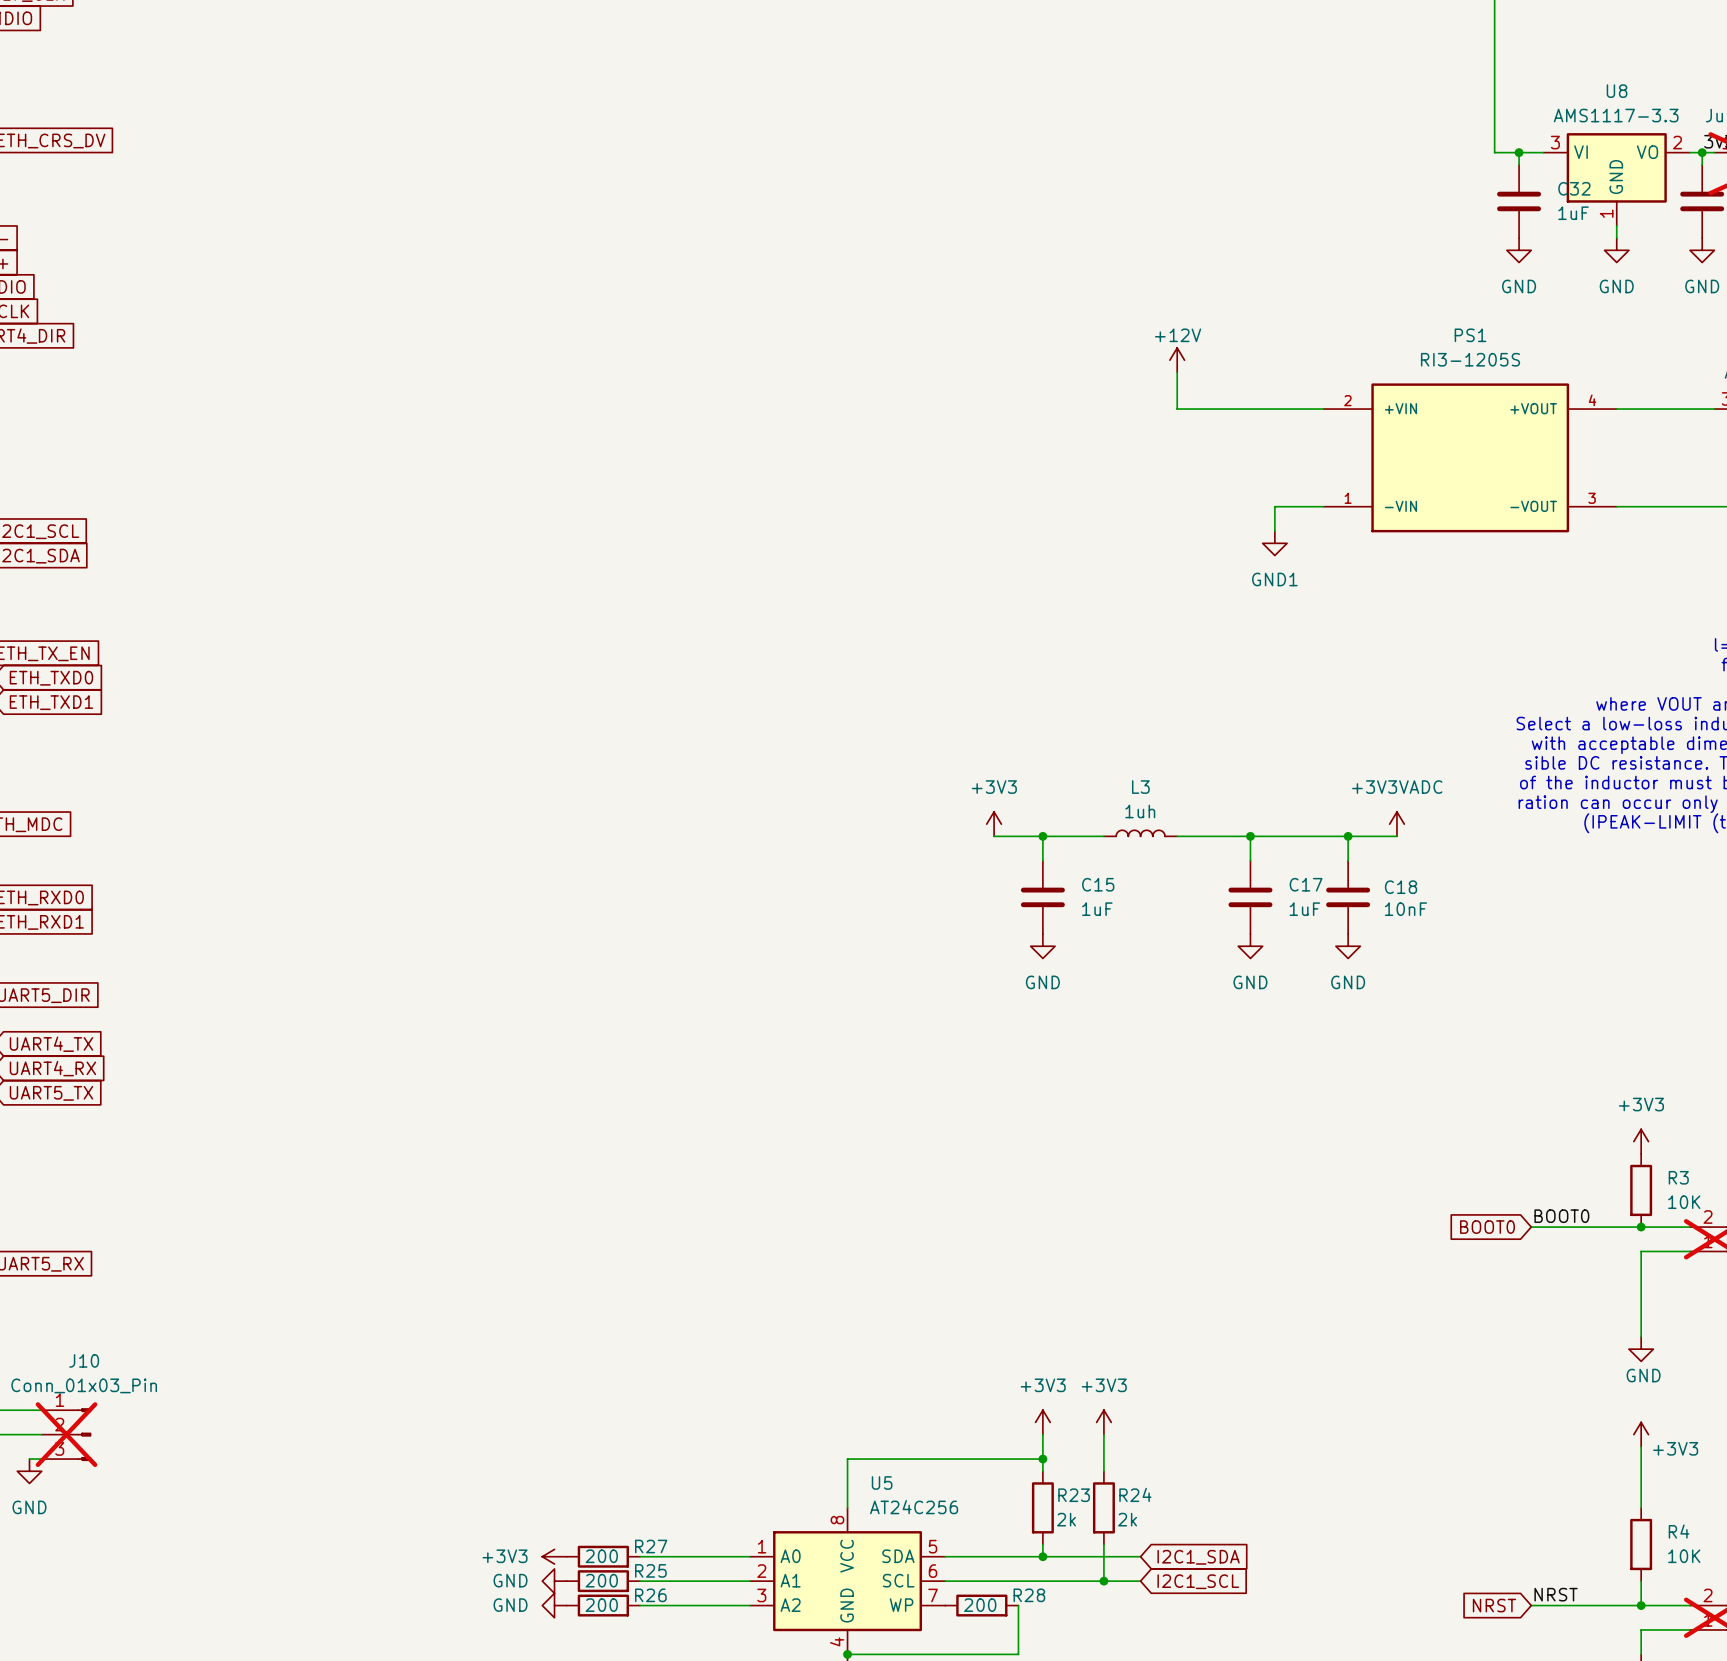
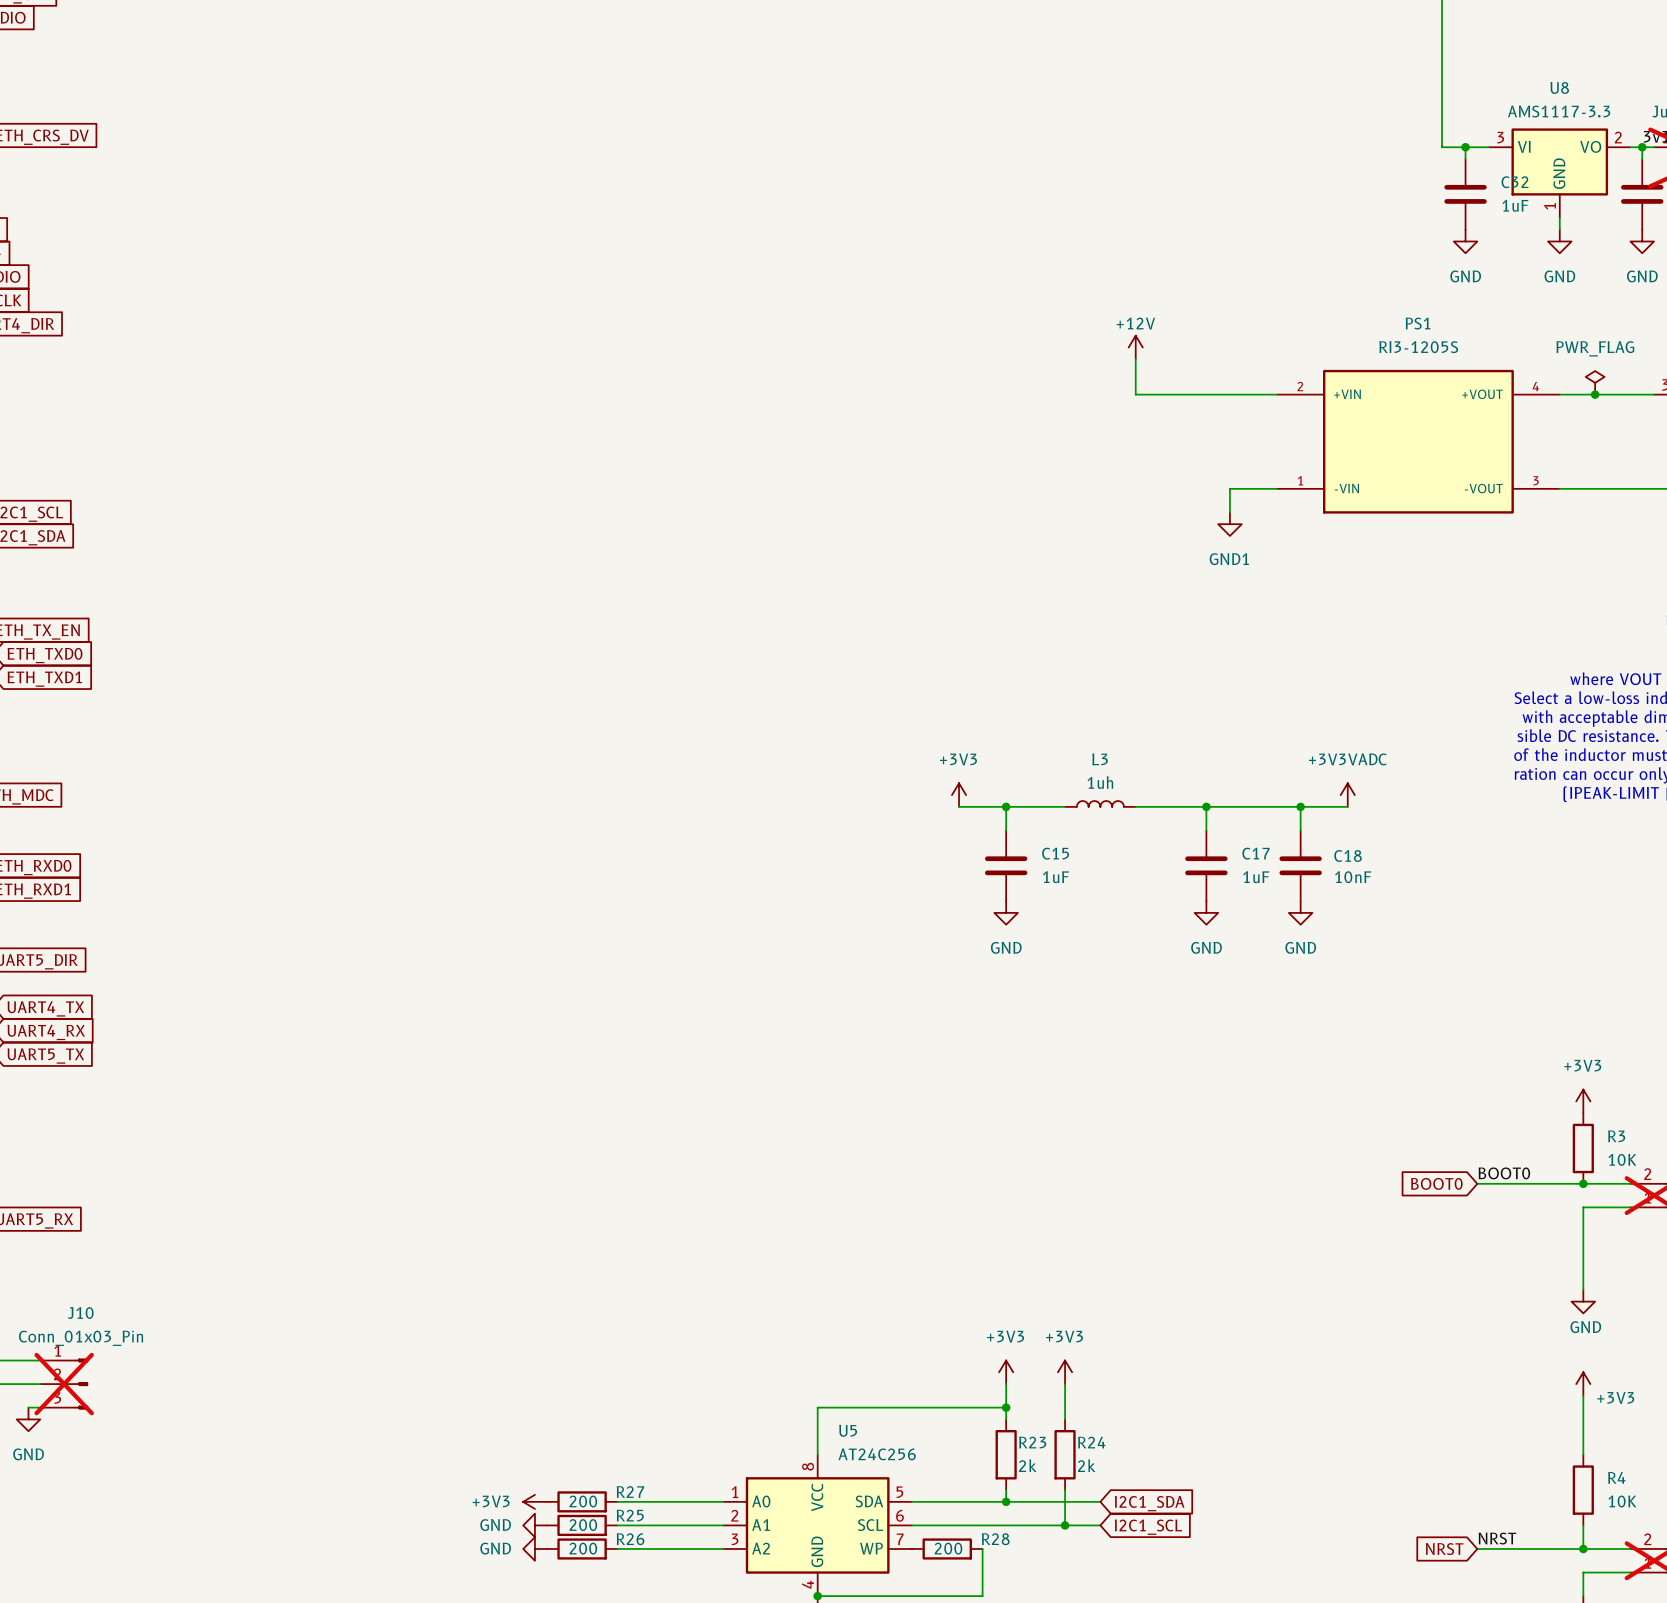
power symbol: none -> PWR_FLAG (1595, 382)
junction: none -> (1595, 394)

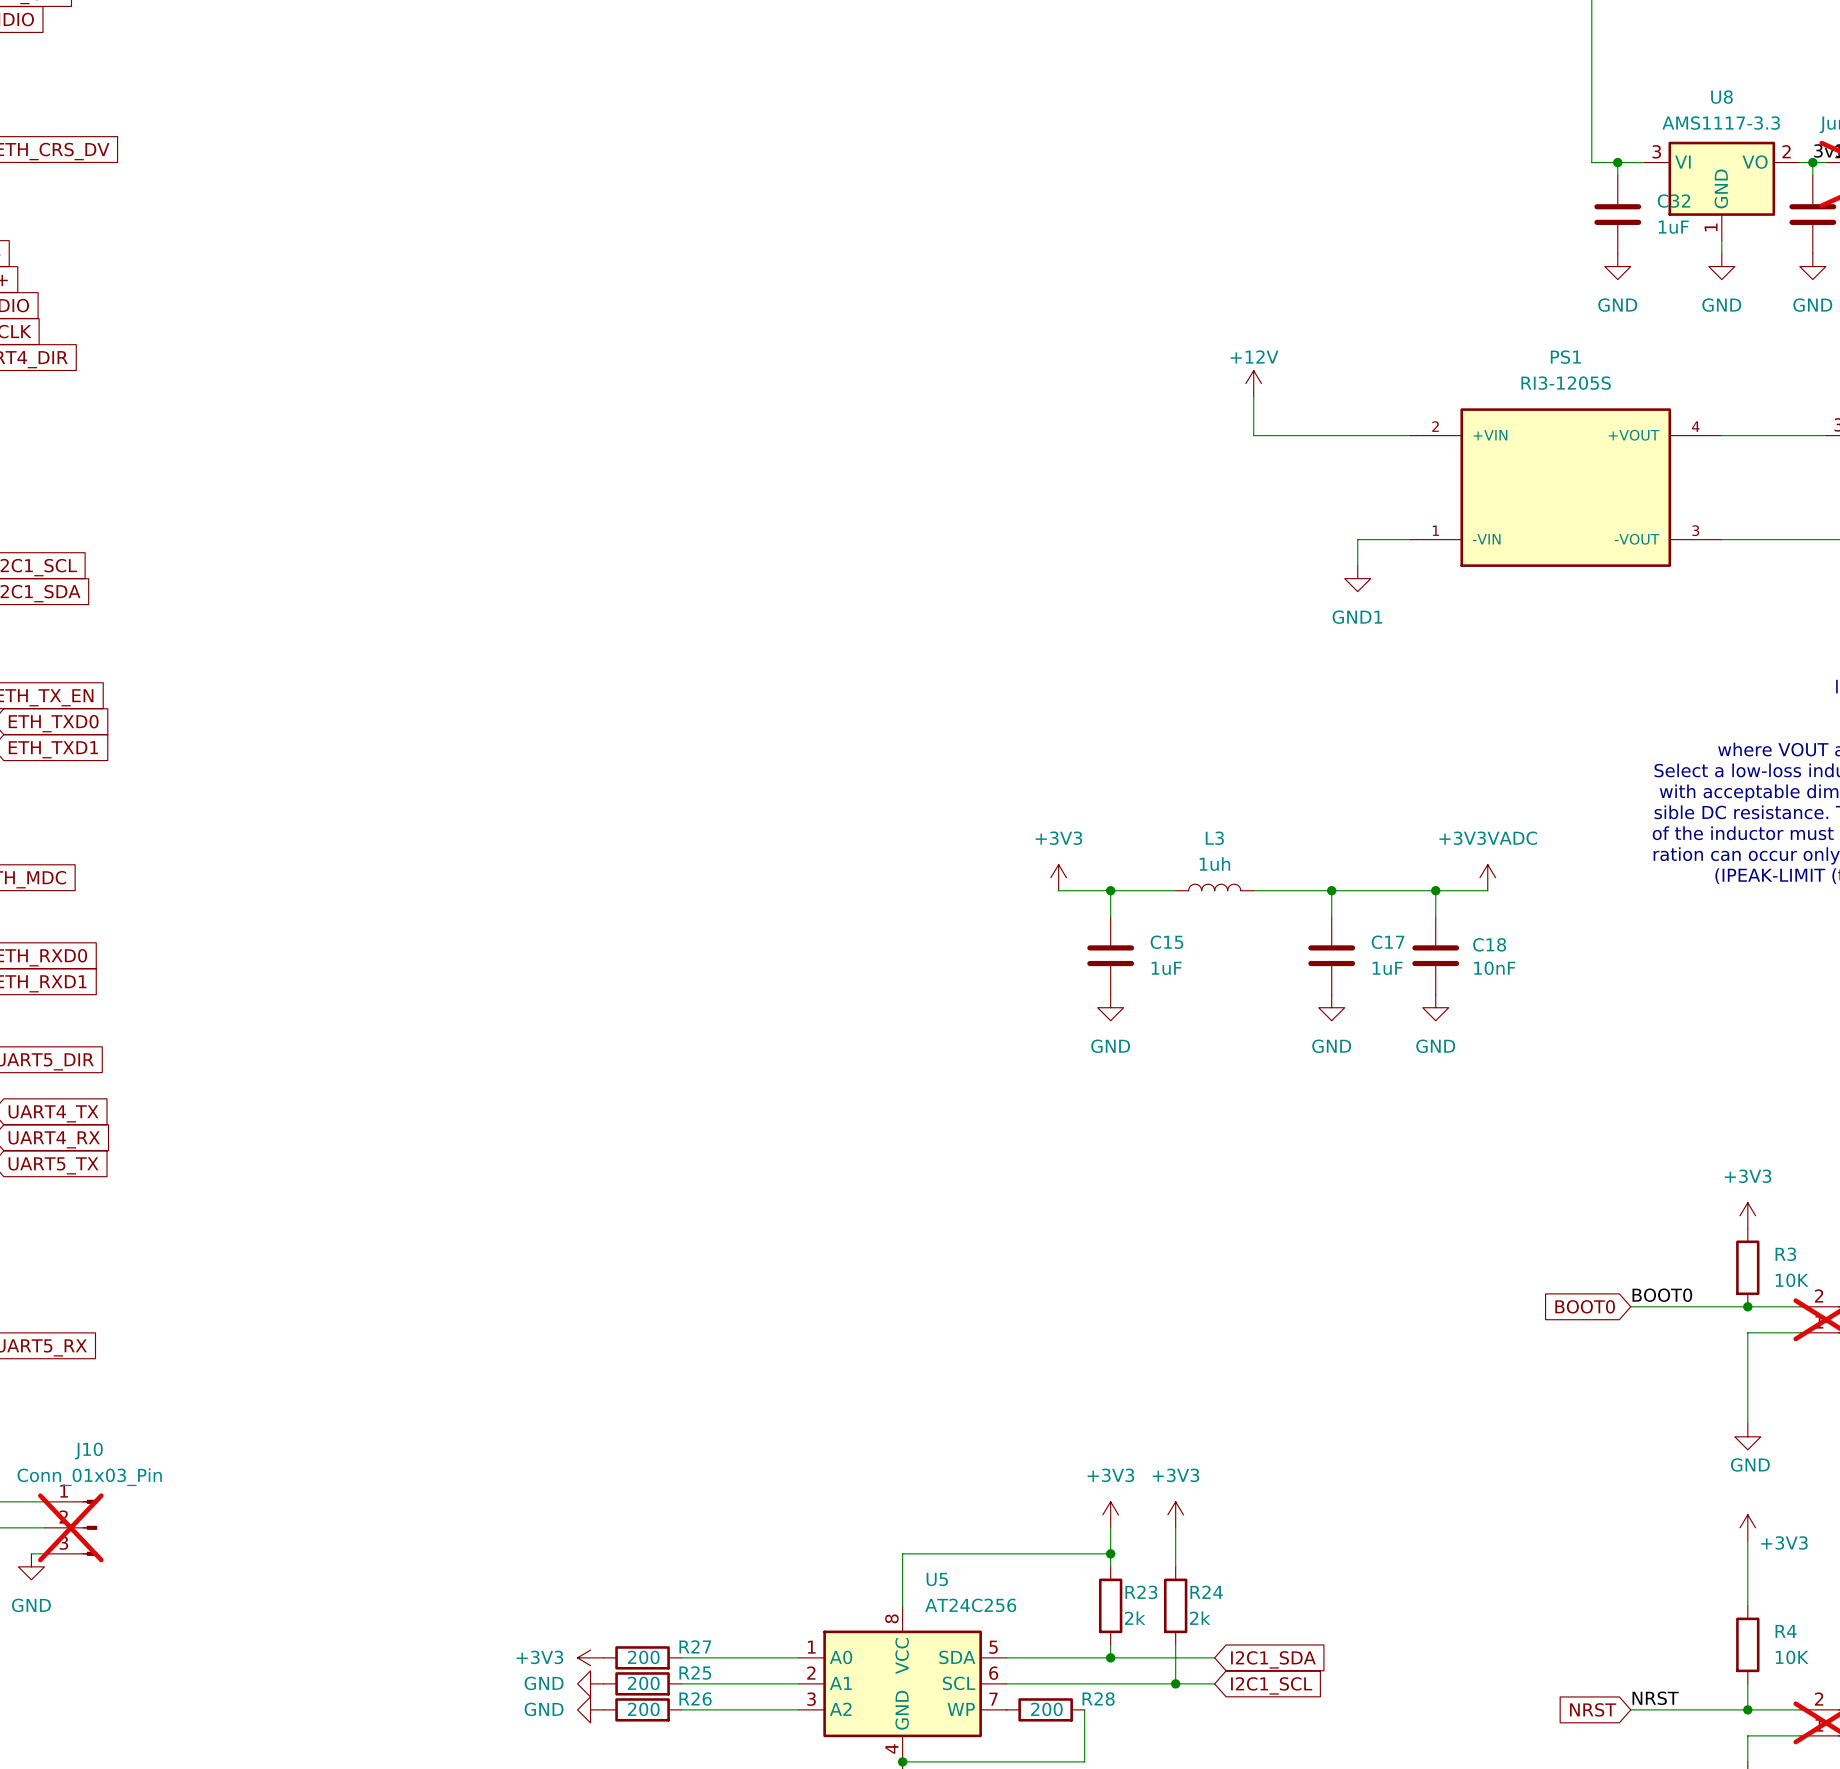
power symbol: PWR_FLAG (1595, 382) -> none
junction: (1595, 394) -> none

